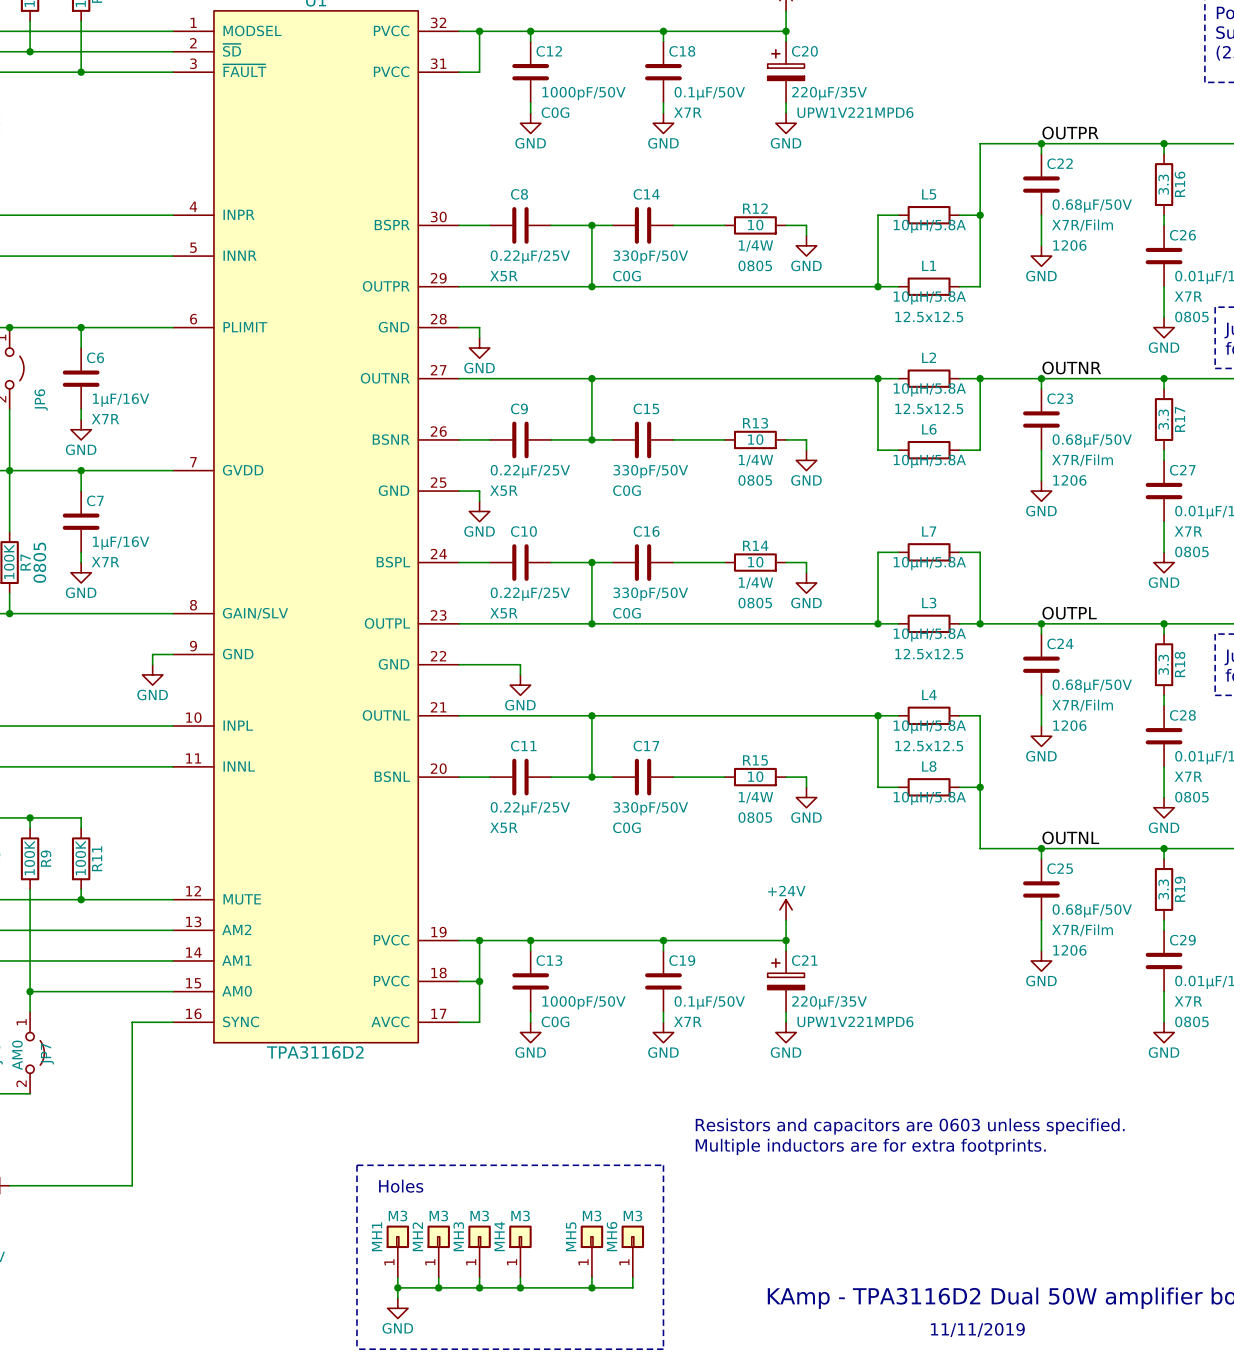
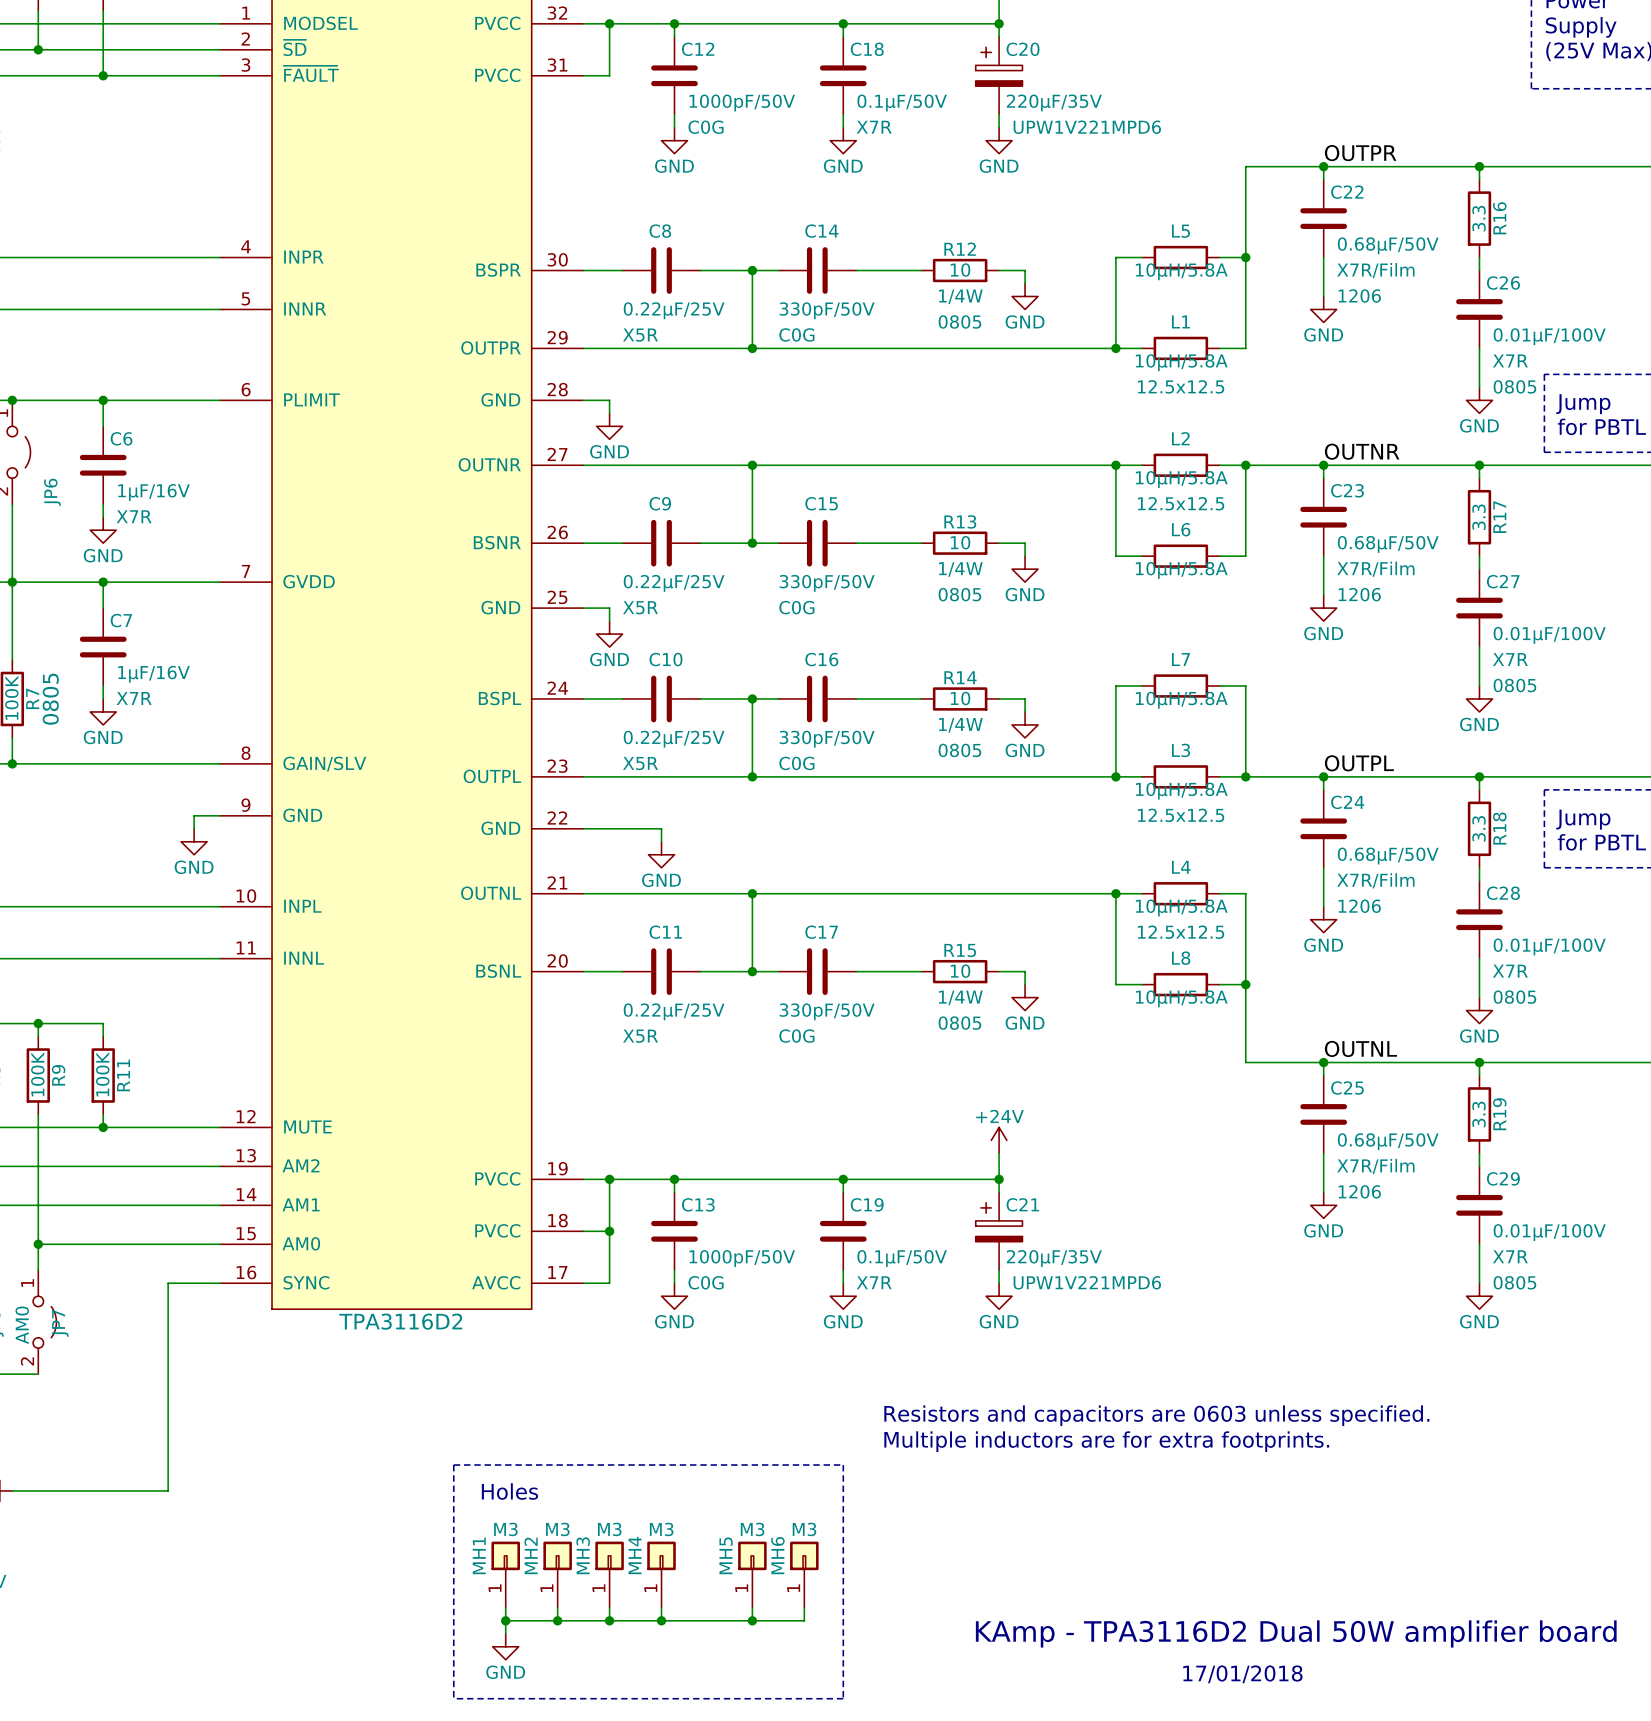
text: 11/11/2019 (977, 1330) -> 17/01/2018 (1242, 1674)

